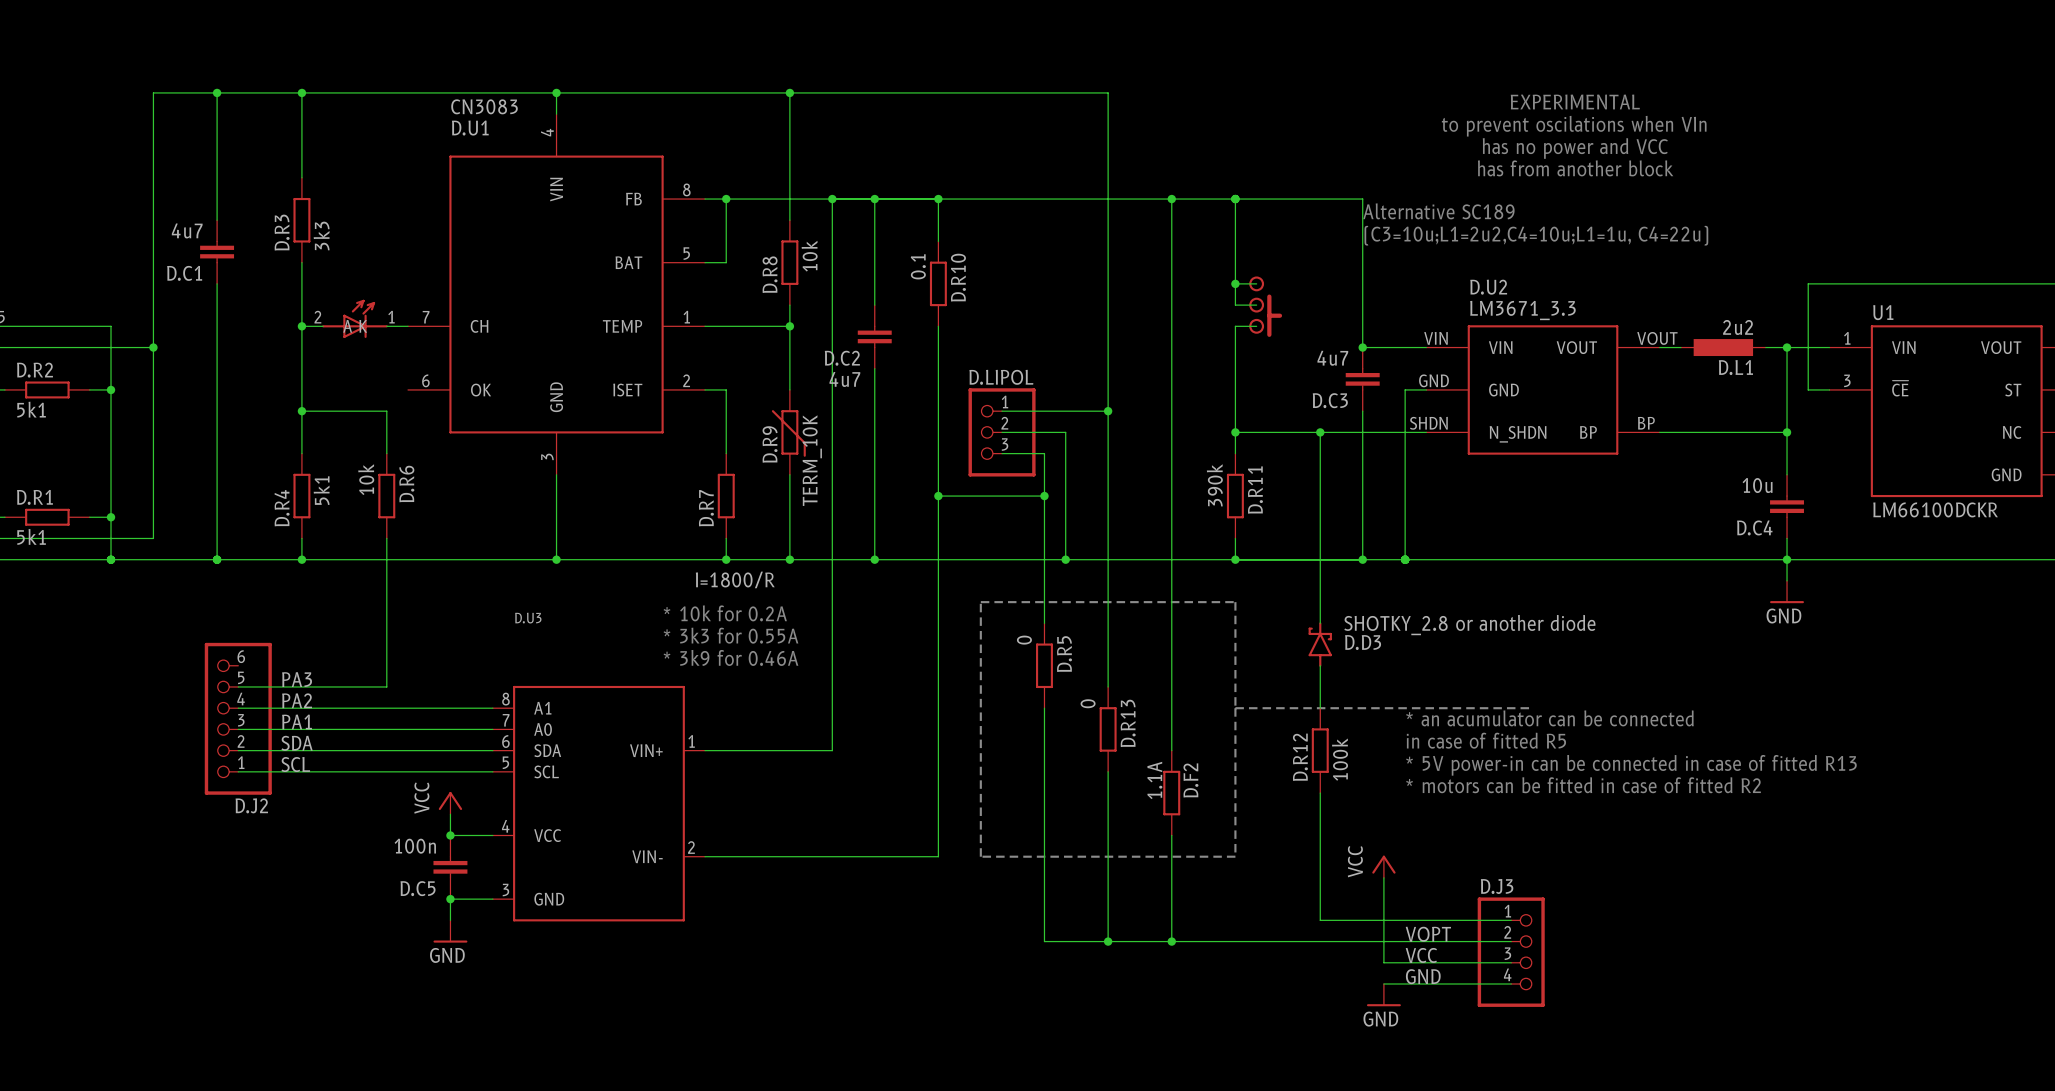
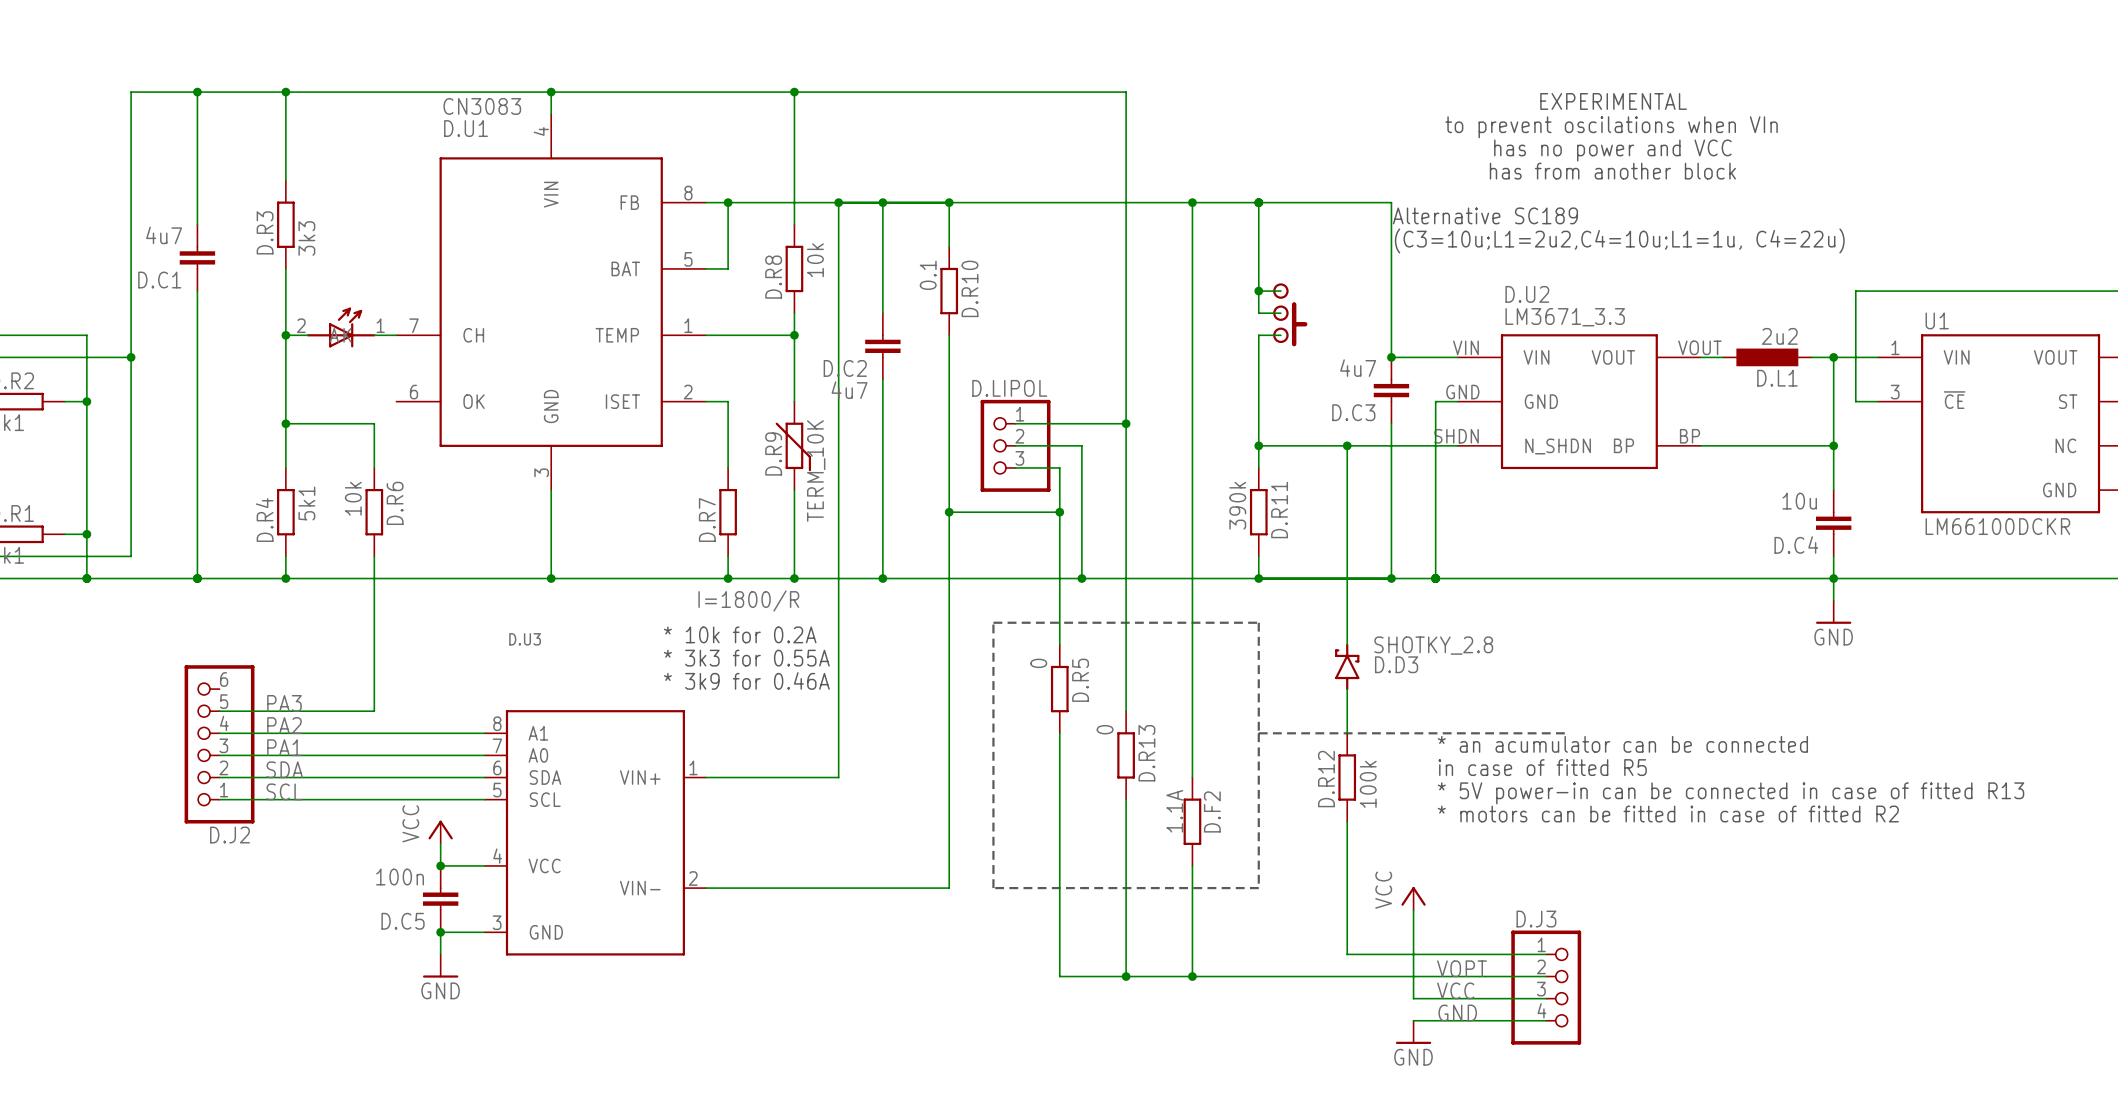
D.D3 value: SHOTKY_2.8 or another diode (1469, 625) -> SHOTKY_2.8 (1433, 645)

